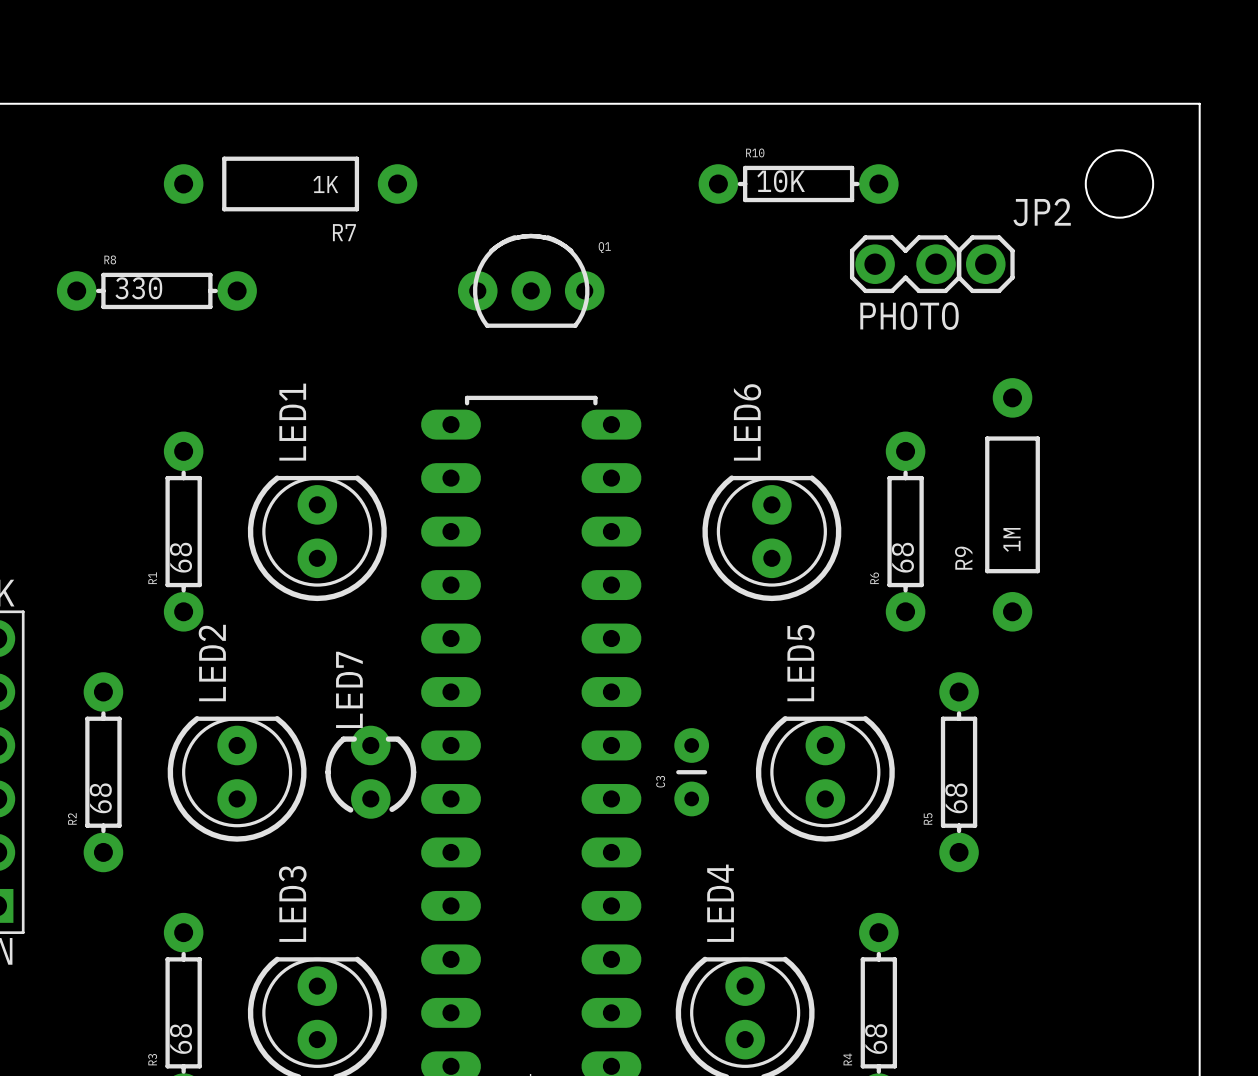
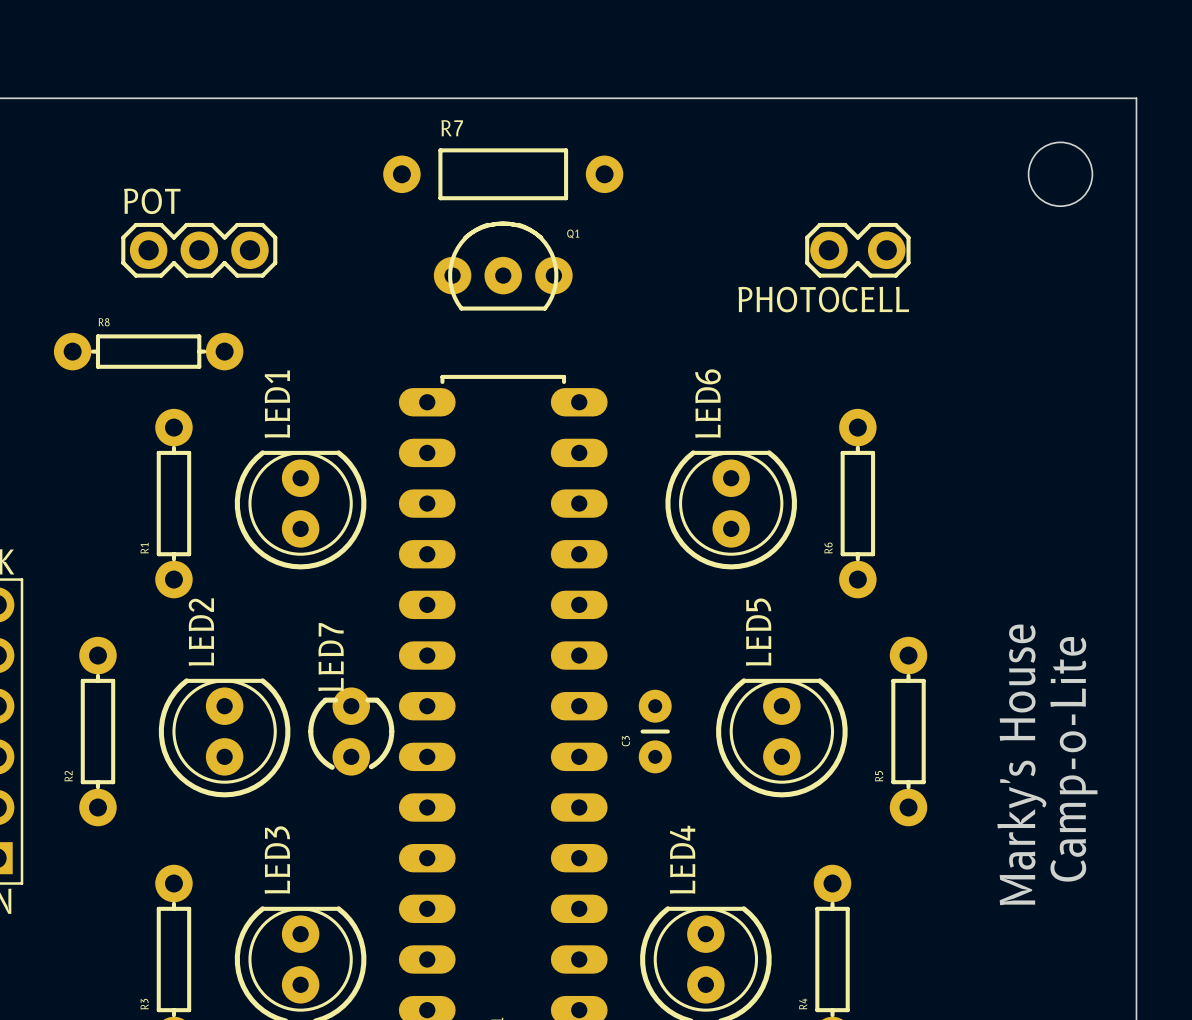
R7 position: (290, 183) -> (503, 174)
R10: 10K (798, 183) -> none
R7 value: 1K (325, 184) -> none
R7 name position: R7 (344, 232) -> R7 (452, 128)
POT: none -> (199, 250)
JP2: (985, 264) -> none
R8 value: 330 (138, 288) -> none
R8 position: (156, 290) -> (148, 351)
PHOTO name: PHOTO (909, 316) -> PHOTOCELL (823, 299)
R9: 1M (1012, 504) -> none
R1 value: 68 (180, 557) -> none
R6 value: 68 (902, 557) -> none
text: none -> Marky's House (1021, 764)
text: none -> Camp-o-Lite (1073, 759)
R2 value: 68 (100, 798) -> none
R5 value: 68 (956, 798) -> none
R3 value: 68 (180, 1038) -> none
R4 value: 68 (876, 1038) -> none

